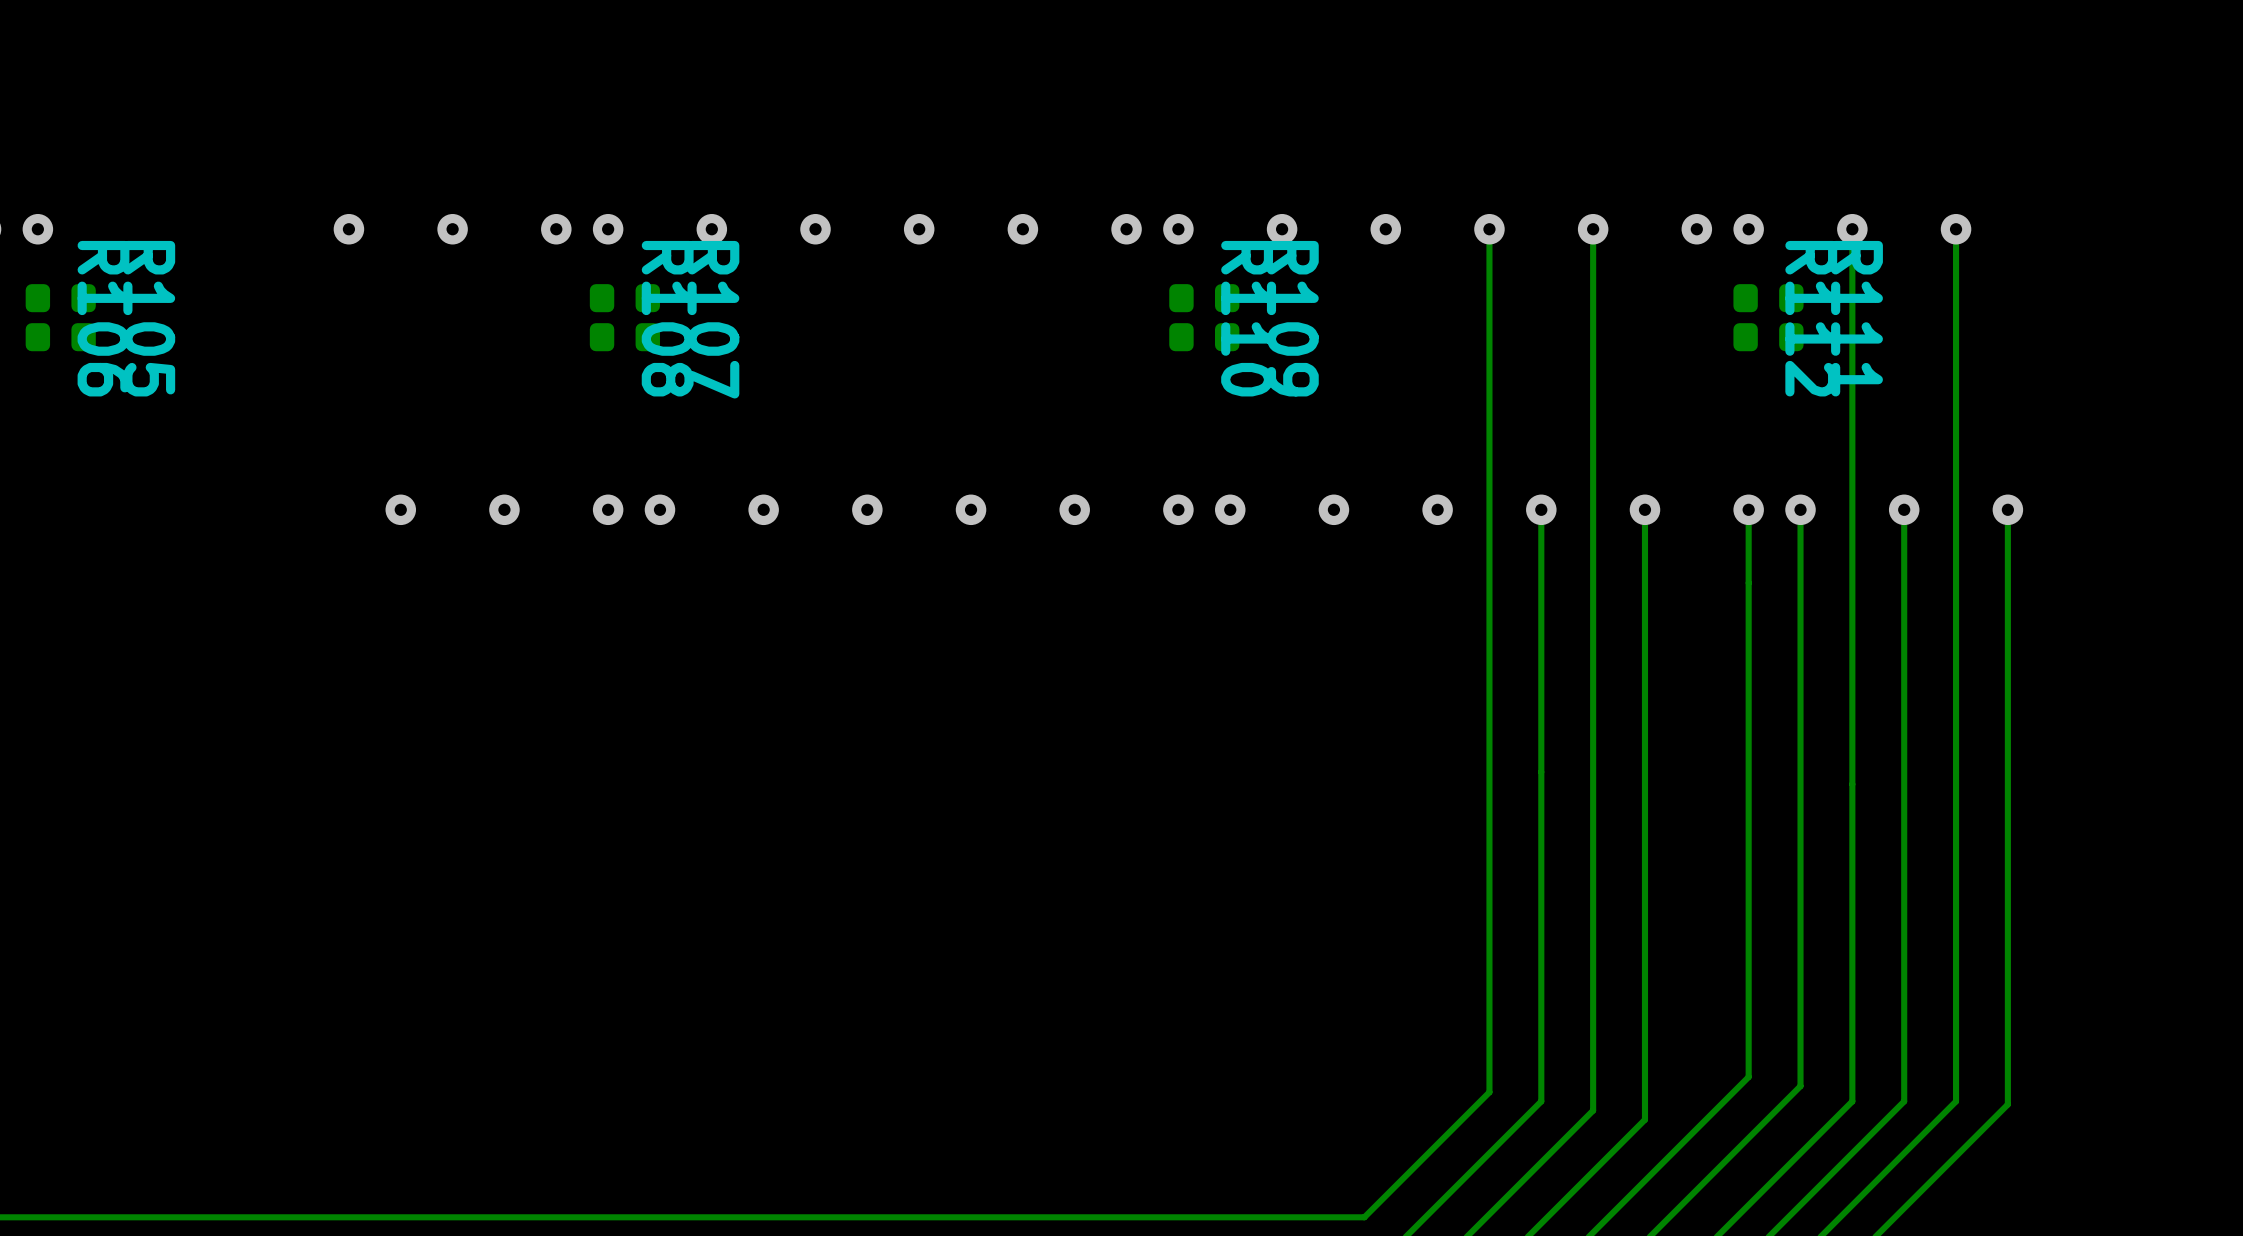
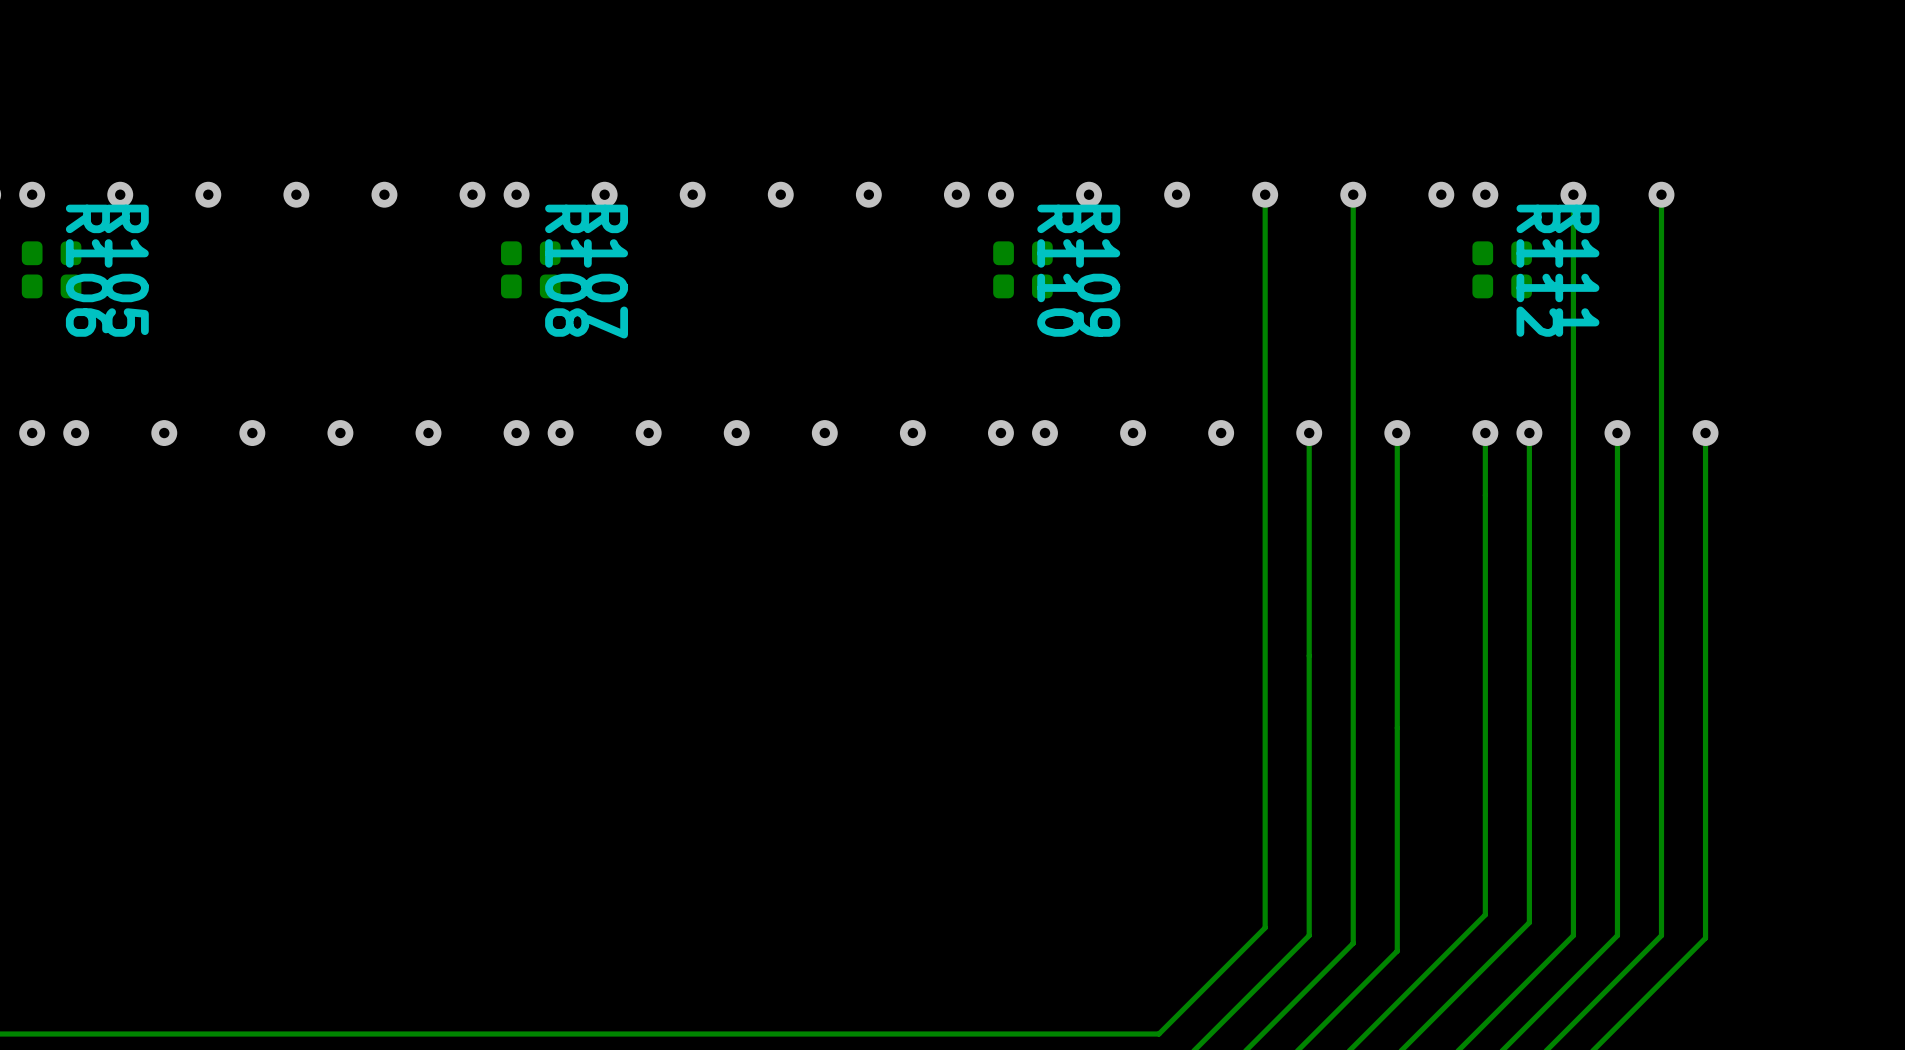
via: none -> (120, 194)
via: none -> (208, 194)
via: none -> (32, 433)
via: none -> (76, 433)
via: none -> (164, 433)
via: none -> (252, 433)

